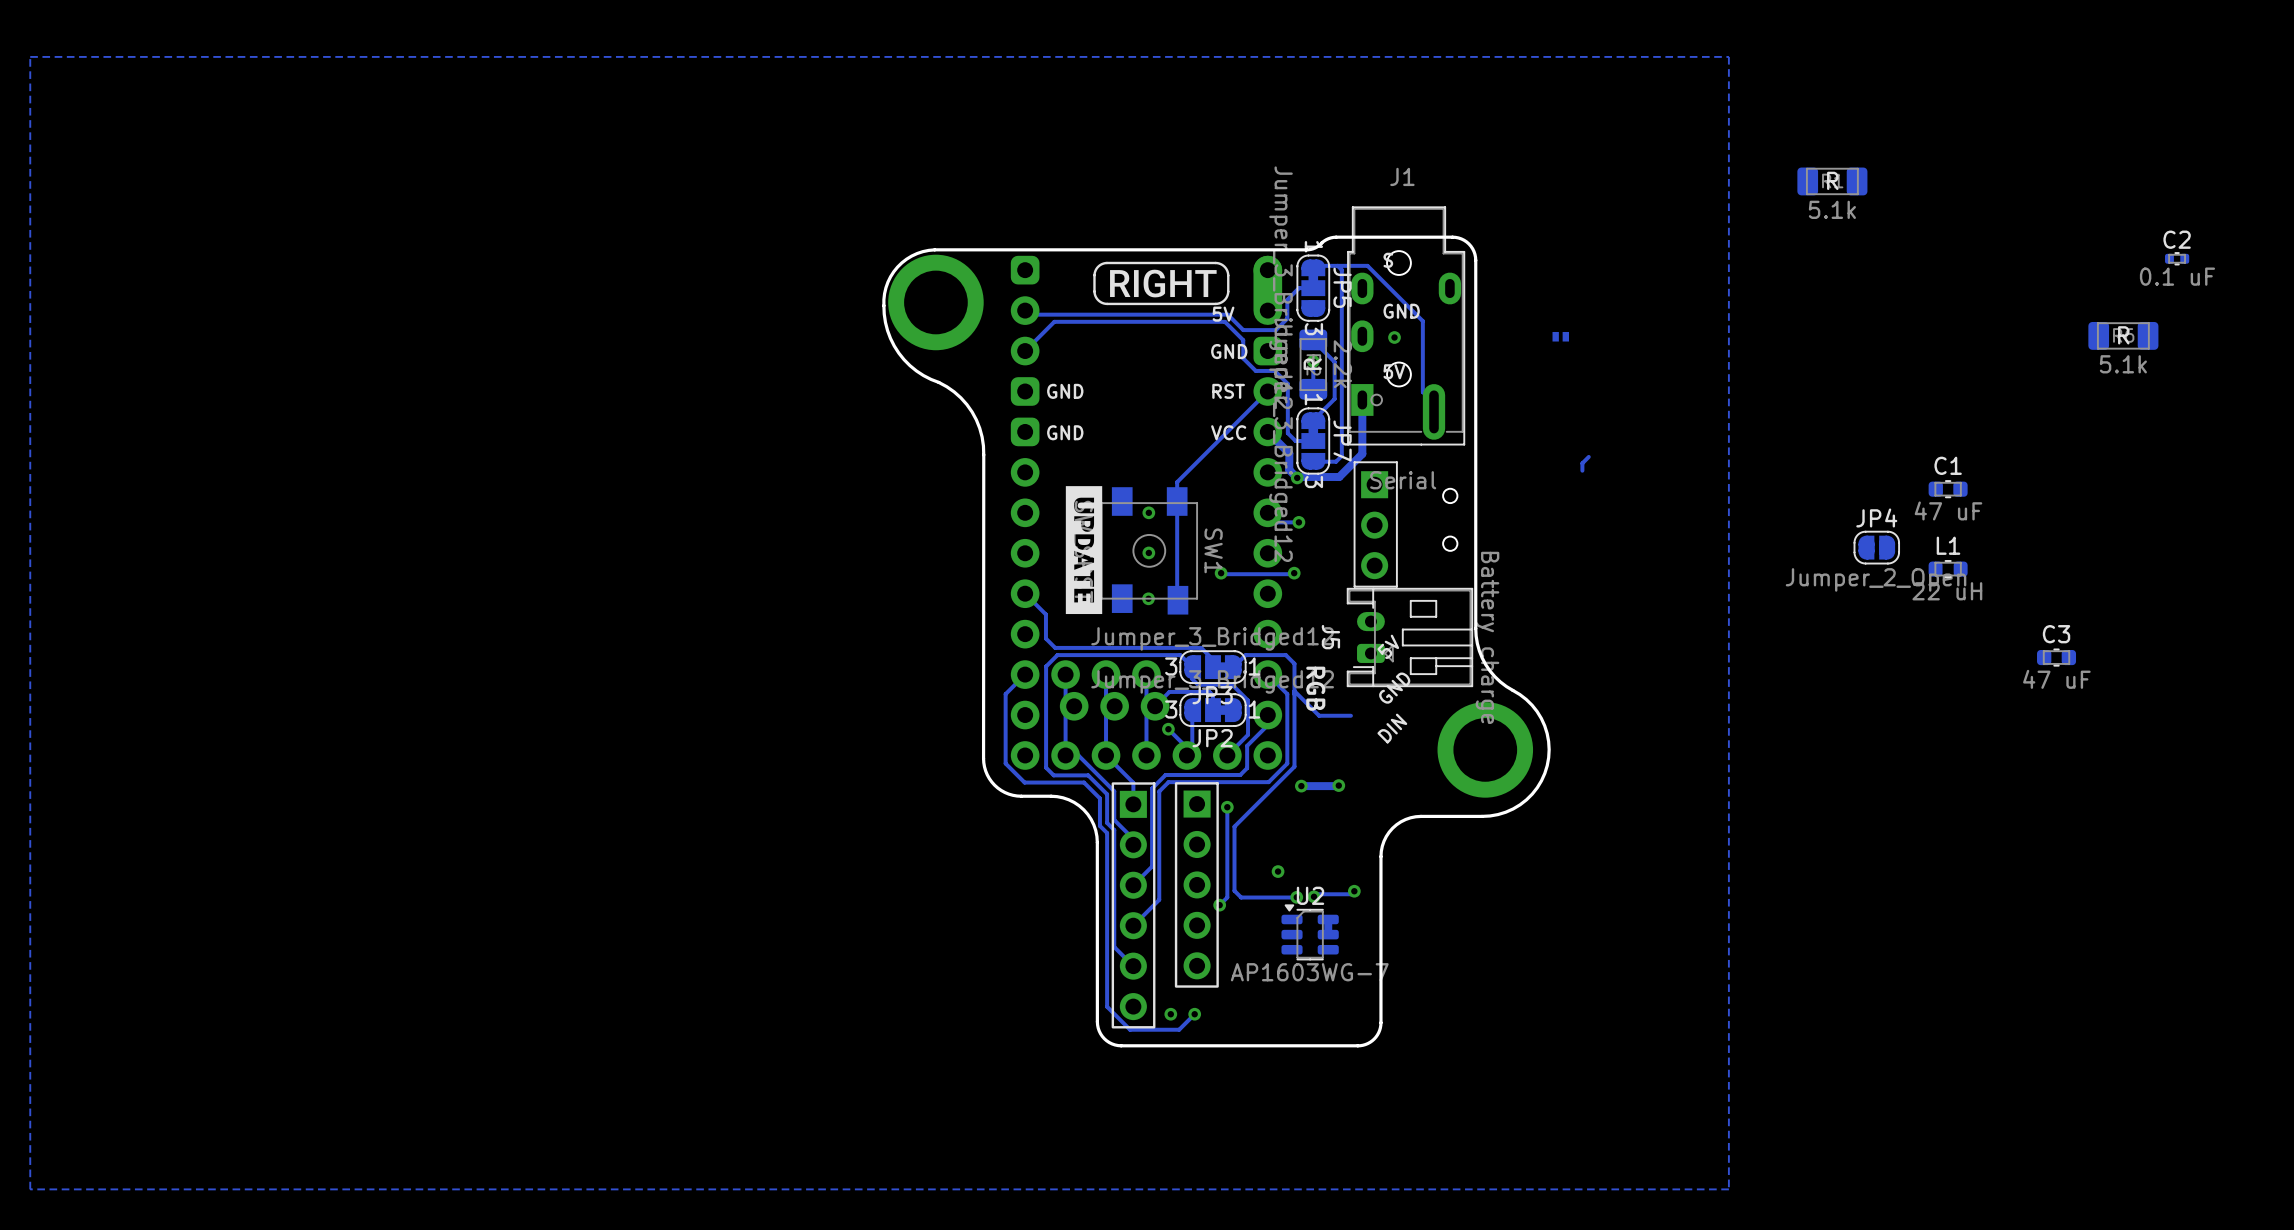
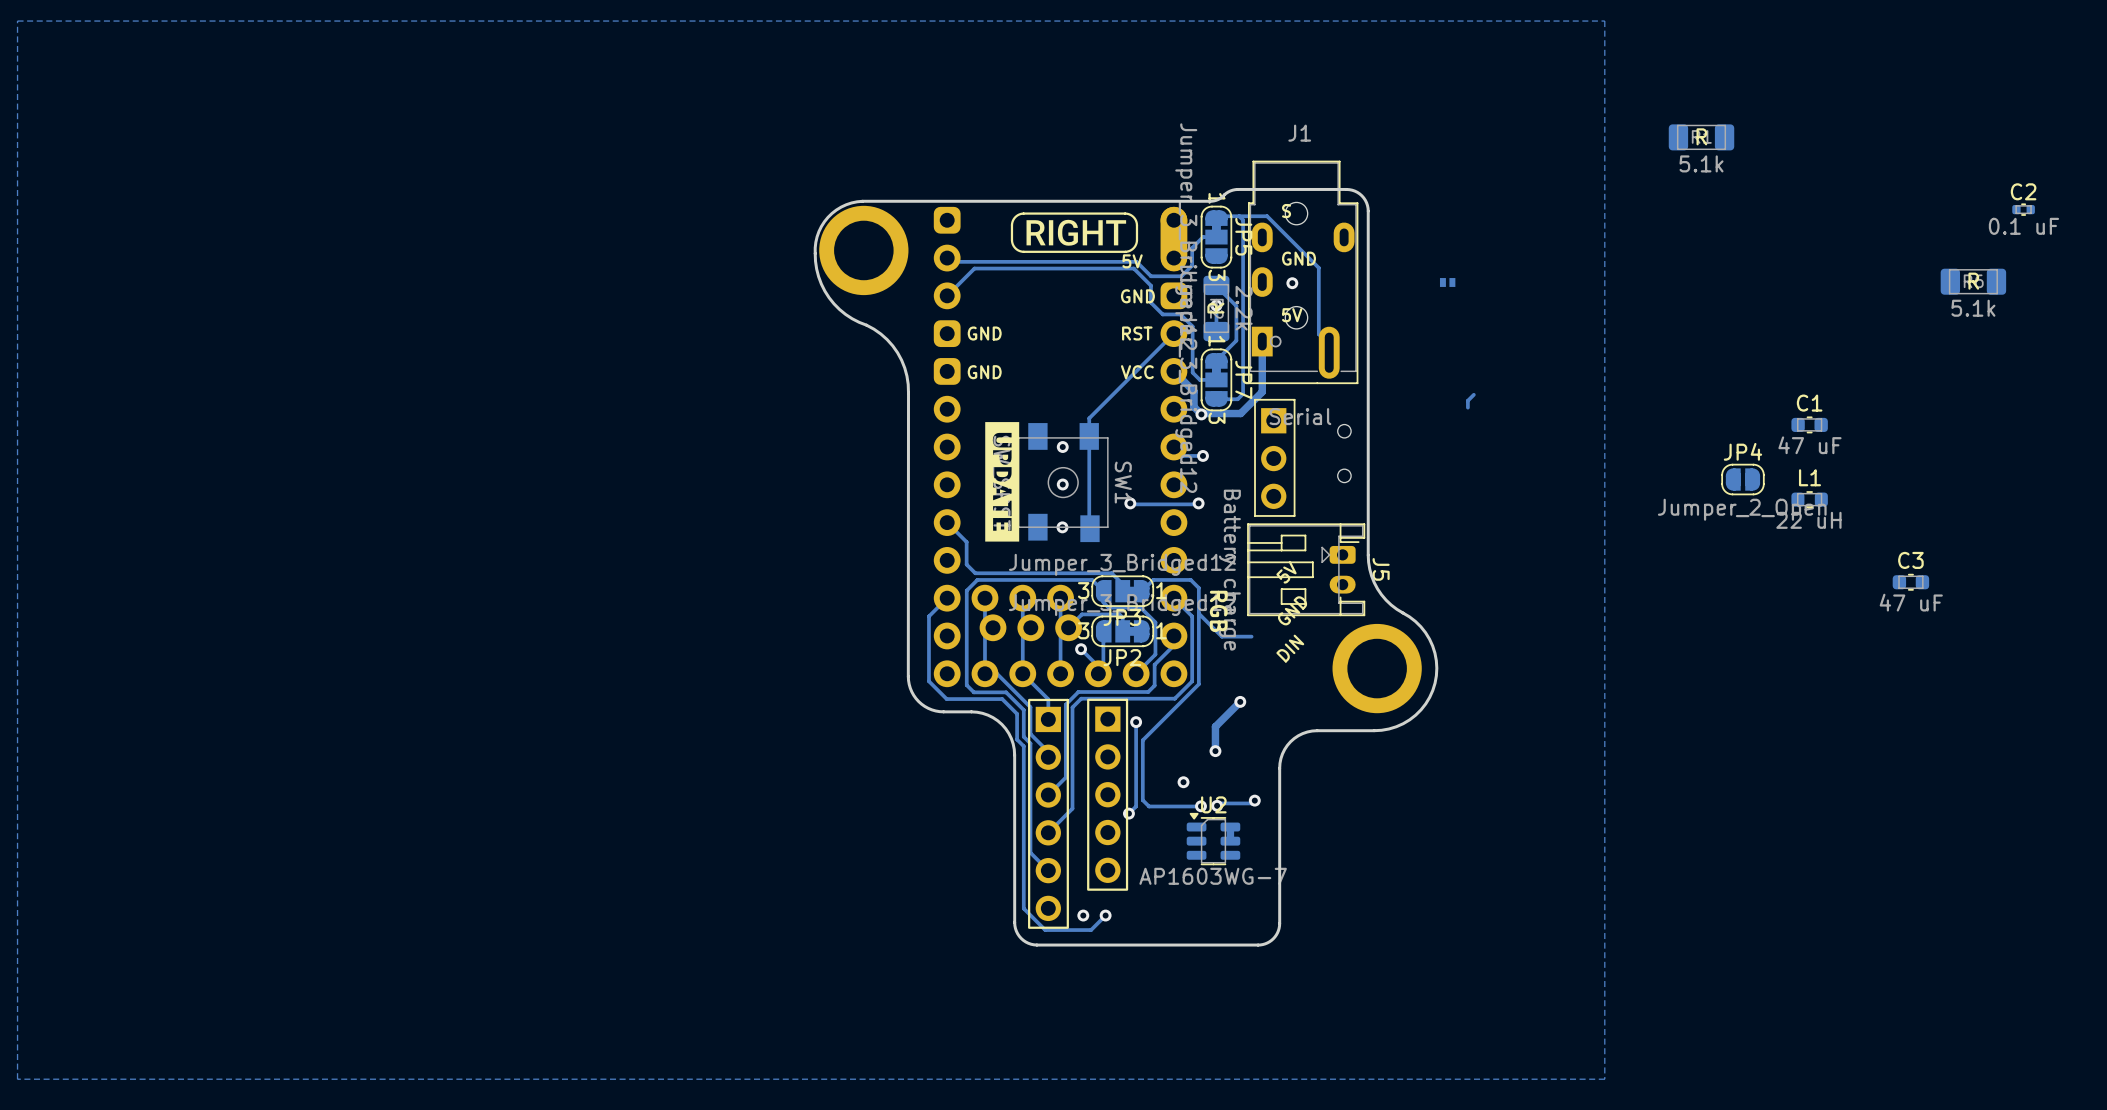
J5 rotation: 0° (1409, 637) -> 180° (1306, 569)
via position: (1301, 786) -> (1215, 751)
track: (1338, 786) (1301, 786) -> (1239, 702) (1215, 726) (1215, 751)

